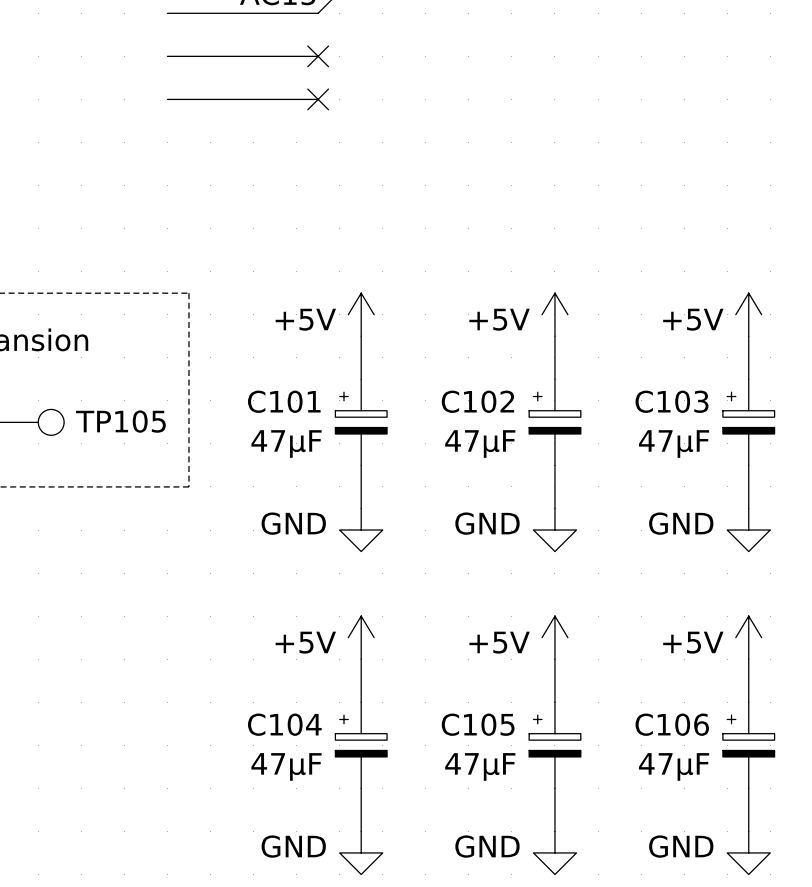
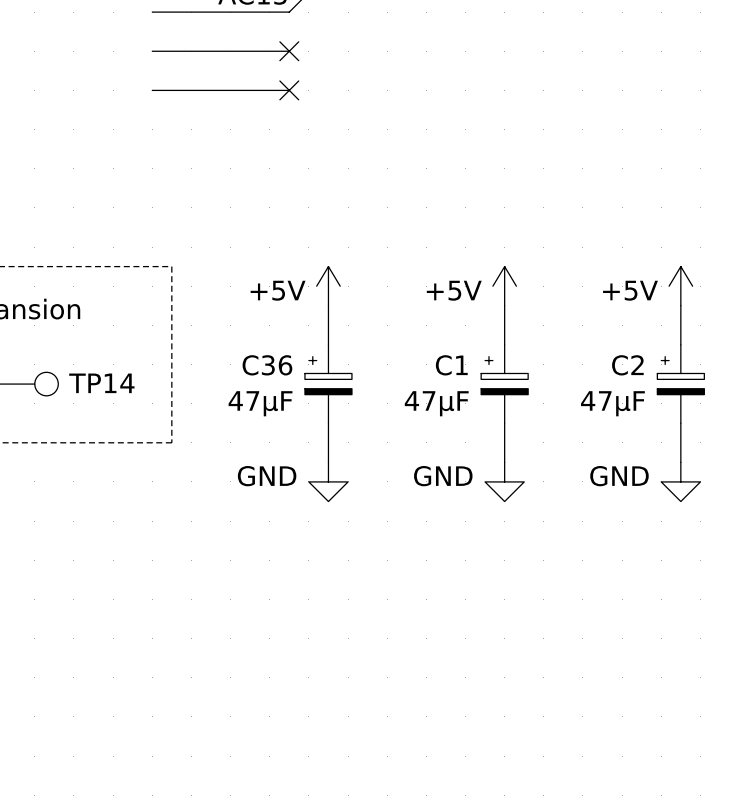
C101 name: C101 (284, 401) -> C36 (267, 365)
C102 name: C102 (477, 401) -> C1 (451, 365)
C103 name: C103 (672, 401) -> C2 (627, 365)
TP105 name: TP105 (120, 421) -> TP14 (101, 383)
power symbol: +5V (361, 637) -> none
power symbol: +5V (554, 637) -> none
power symbol: +5V (748, 637) -> none
wire: (361, 659) (361, 702) -> none
wire: (554, 659) (554, 702) -> none
wire: (748, 659) (748, 702) -> none
C104: 47µF (361, 745) -> none
C105: 47µF (554, 745) -> none
C106: 47µF (748, 745) -> none
wire: (361, 788) (361, 831) -> none
wire: (554, 788) (554, 831) -> none
wire: (748, 788) (748, 831) -> none
power symbol: GND (361, 852) -> none
power symbol: GND (554, 852) -> none
power symbol: GND (748, 852) -> none

